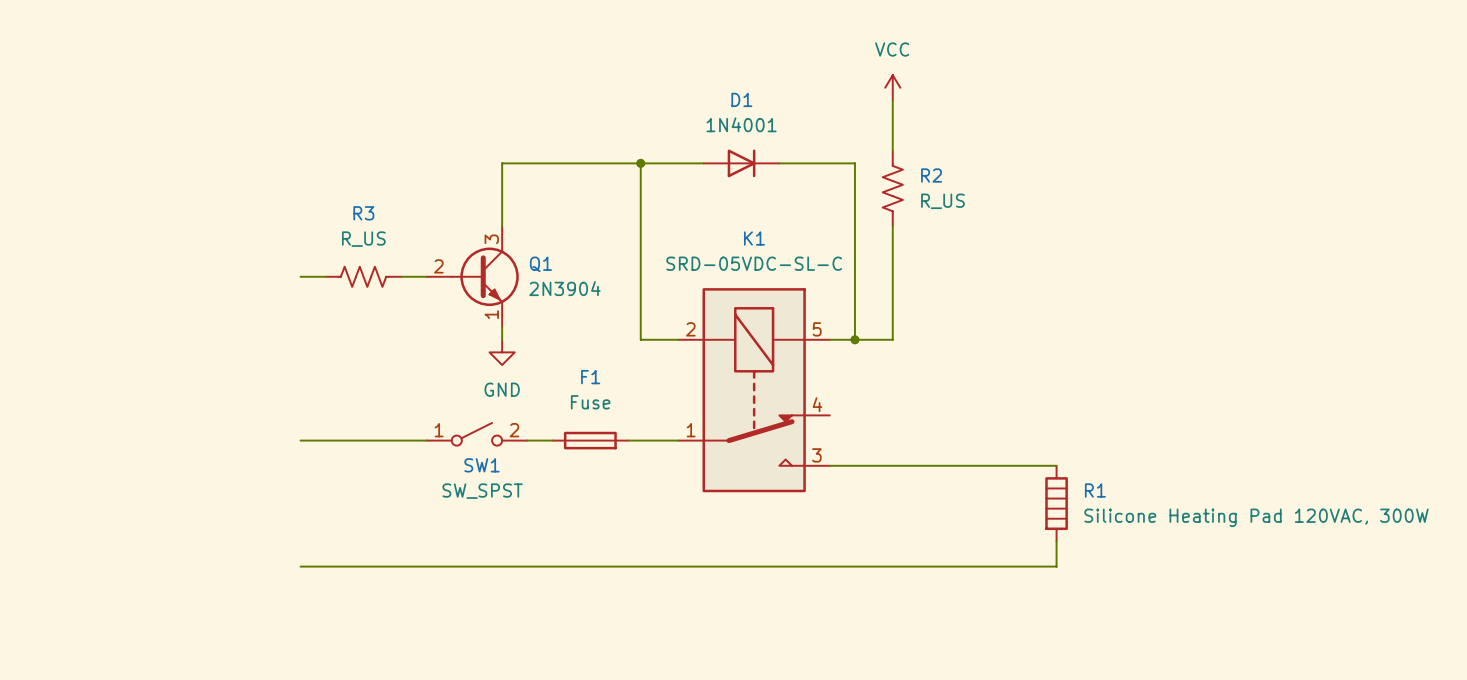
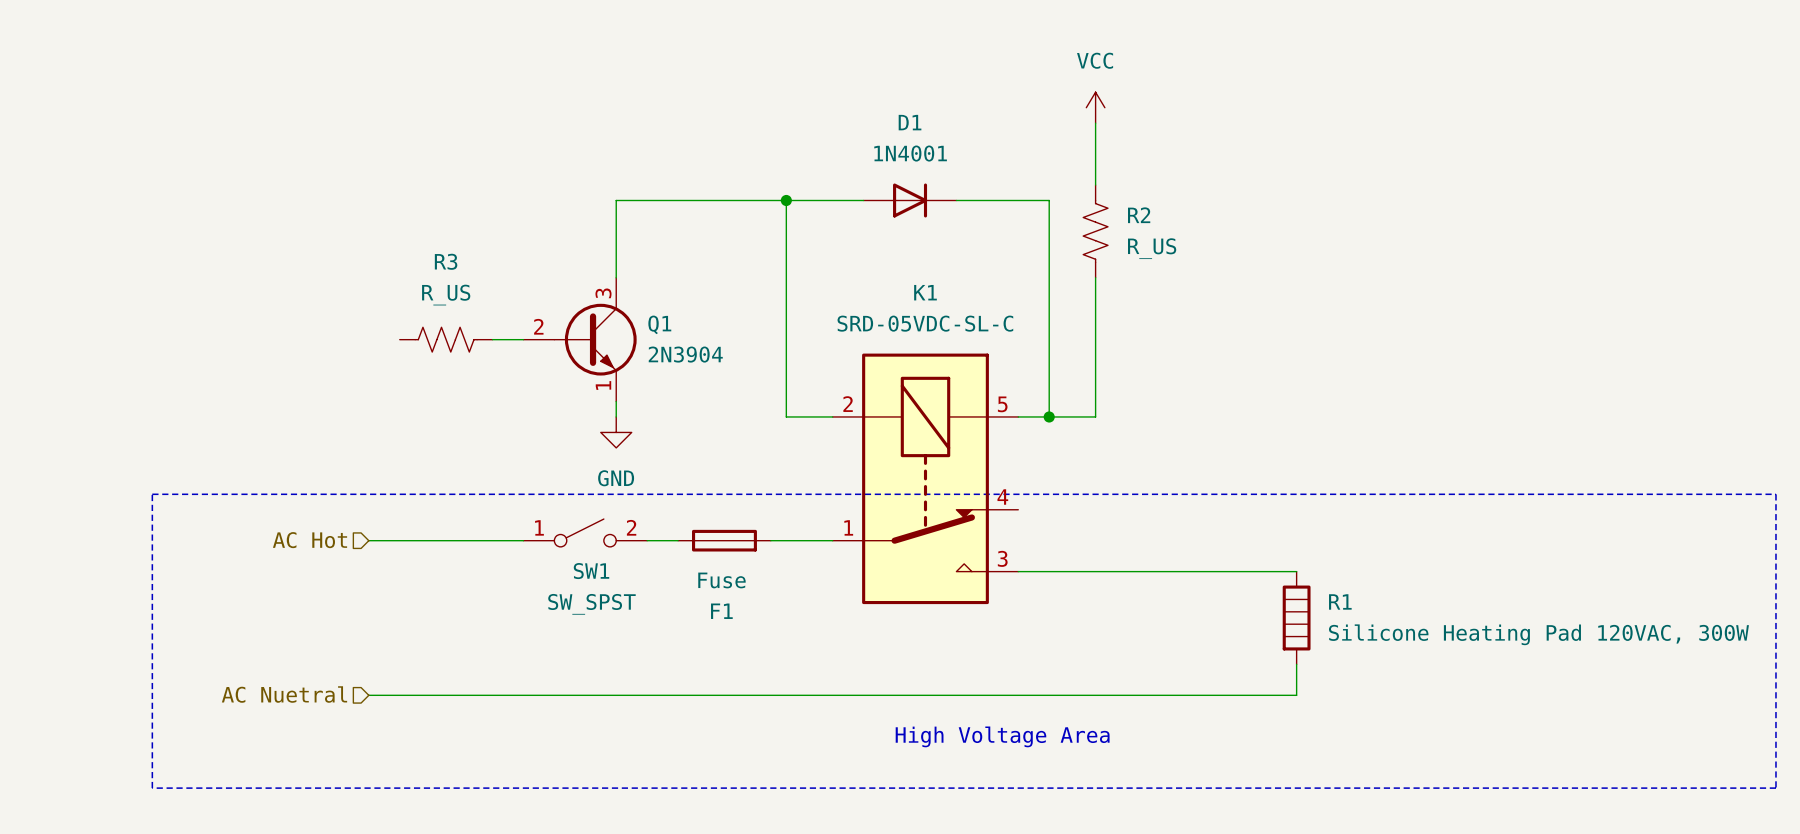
wire: (300, 276) (325, 276) -> none
F1 name position: F1 (590, 377) -> F1 (721, 611)
line: none -> (152, 494) (1775, 494) (1775, 788) (152, 788) (152, 494)
F1 value position: Fuse (590, 402) -> Fuse (721, 580)
hierarchical label: none -> AC Hot (310, 540)
hierarchical label: none -> AC Nuetral (284, 694)
text: none -> High Voltage Area (1002, 736)

